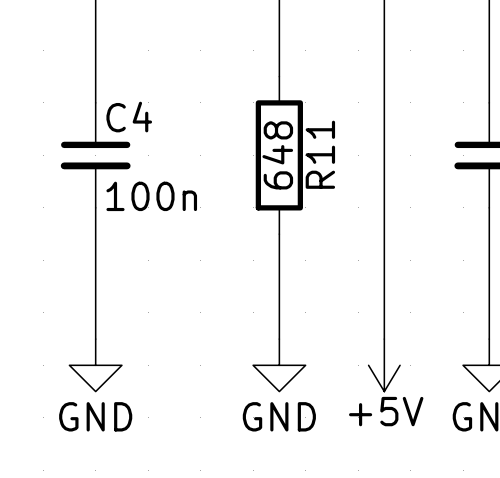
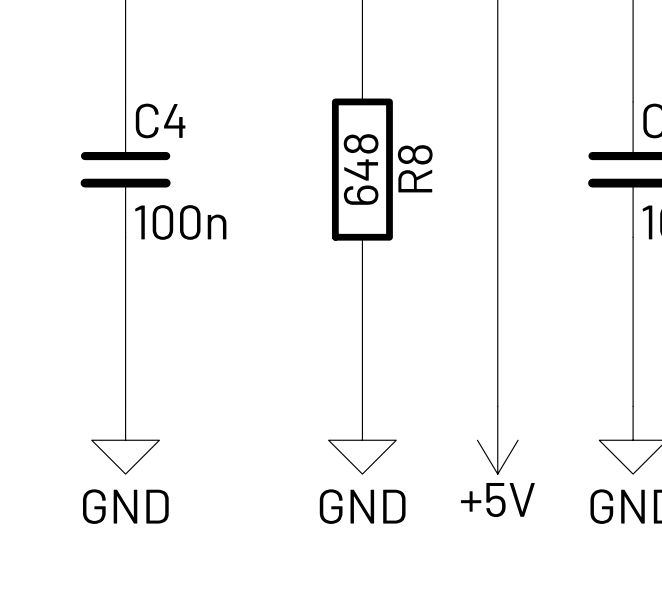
R11 name: R11 (320, 154) -> R8 (415, 168)

